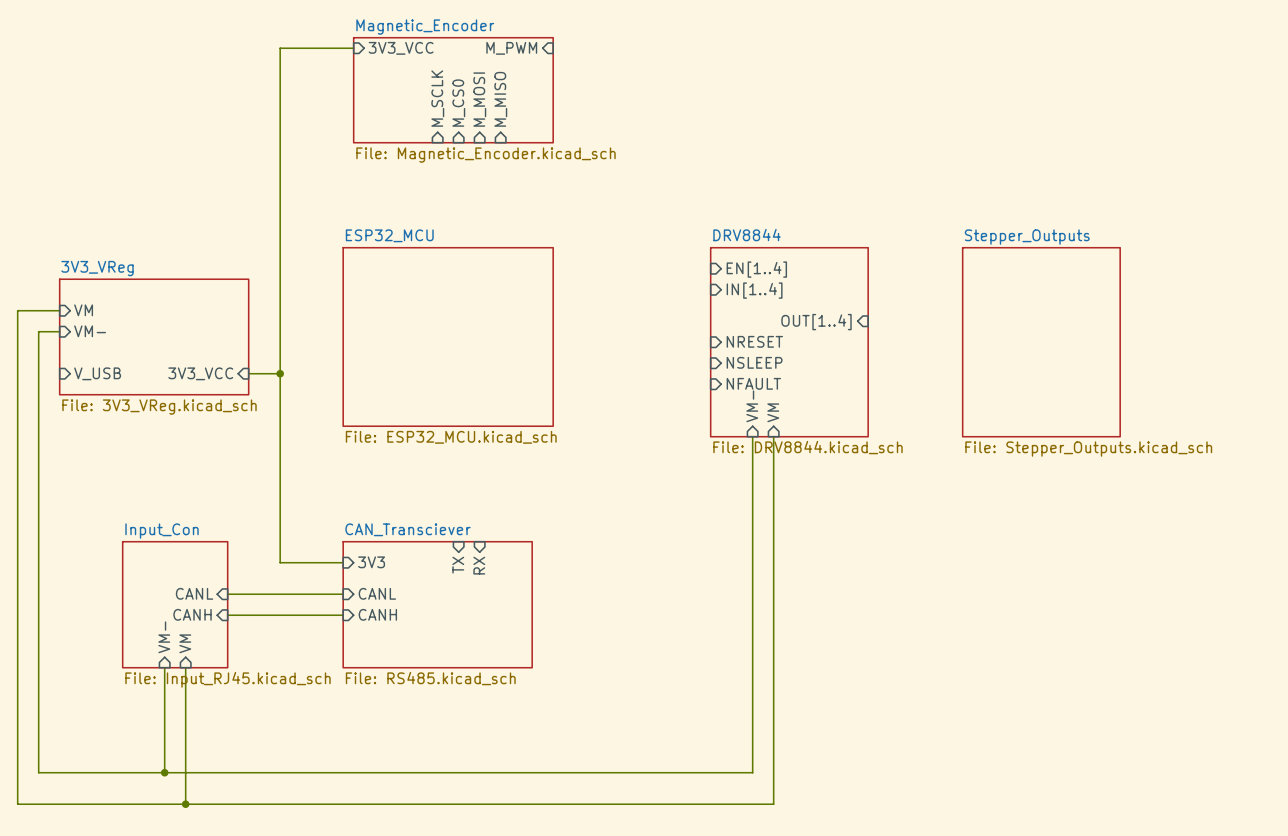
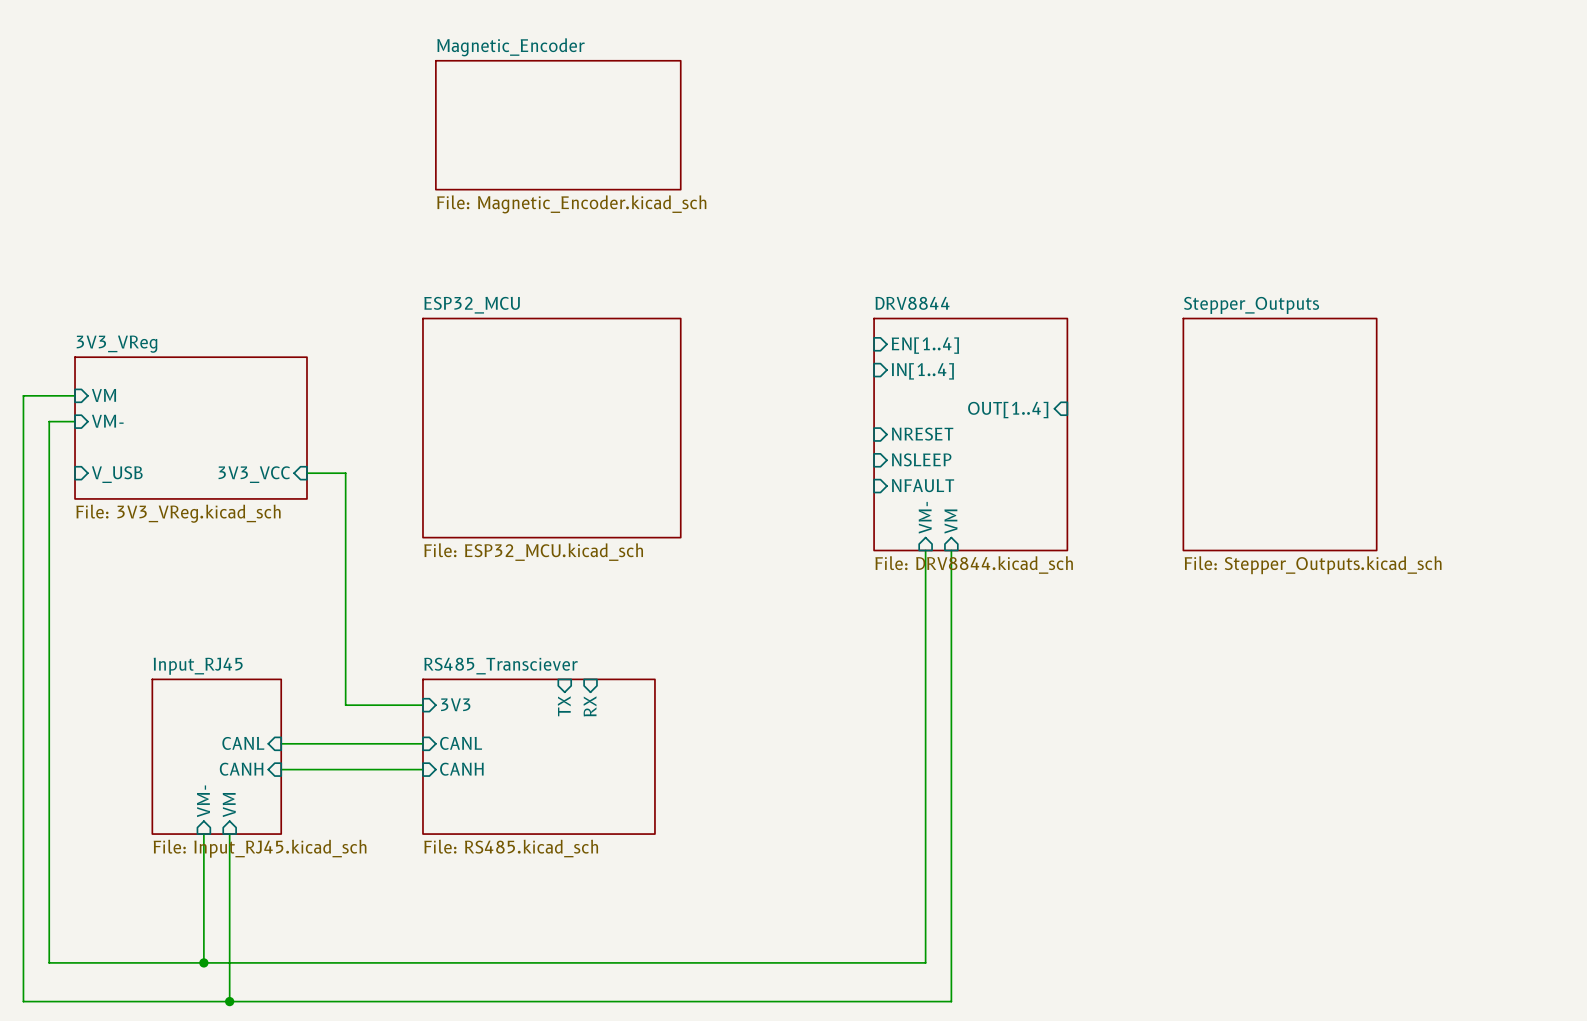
wire: (353, 48) (280, 48) (280, 373) -> none
sheet pin: 3V3_VCC (401, 48) -> none
sheet pin: M_PWM (511, 48) -> none
sheet pin: M_SCLK (437, 98) -> none
sheet pin: M_MOSI (479, 99) -> none
sheet pin: M_MISO (500, 99) -> none
sheet pin: M_CS0 (458, 103) -> none
junction: (280, 373) -> none
sheet CAN_Transciever name: CAN_Transciever (408, 529) -> RS485_Transciever (501, 666)
sheet Input_Con name: Input_Con (162, 531) -> Input_RJ45 (198, 666)

